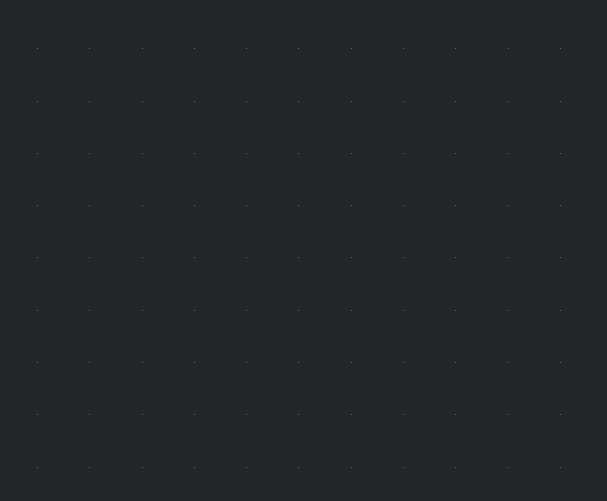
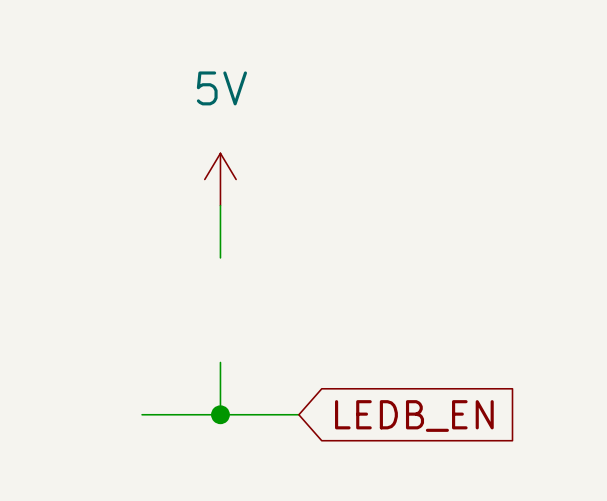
power symbol: none -> 5V (220, 179)
wire: none -> (220, 205) (220, 257)
wire: none -> (220, 362) (220, 414)
wire: none -> (142, 414) (298, 414)
junction: none -> (220, 414)
global label: none -> LEDB_EN (414, 416)

